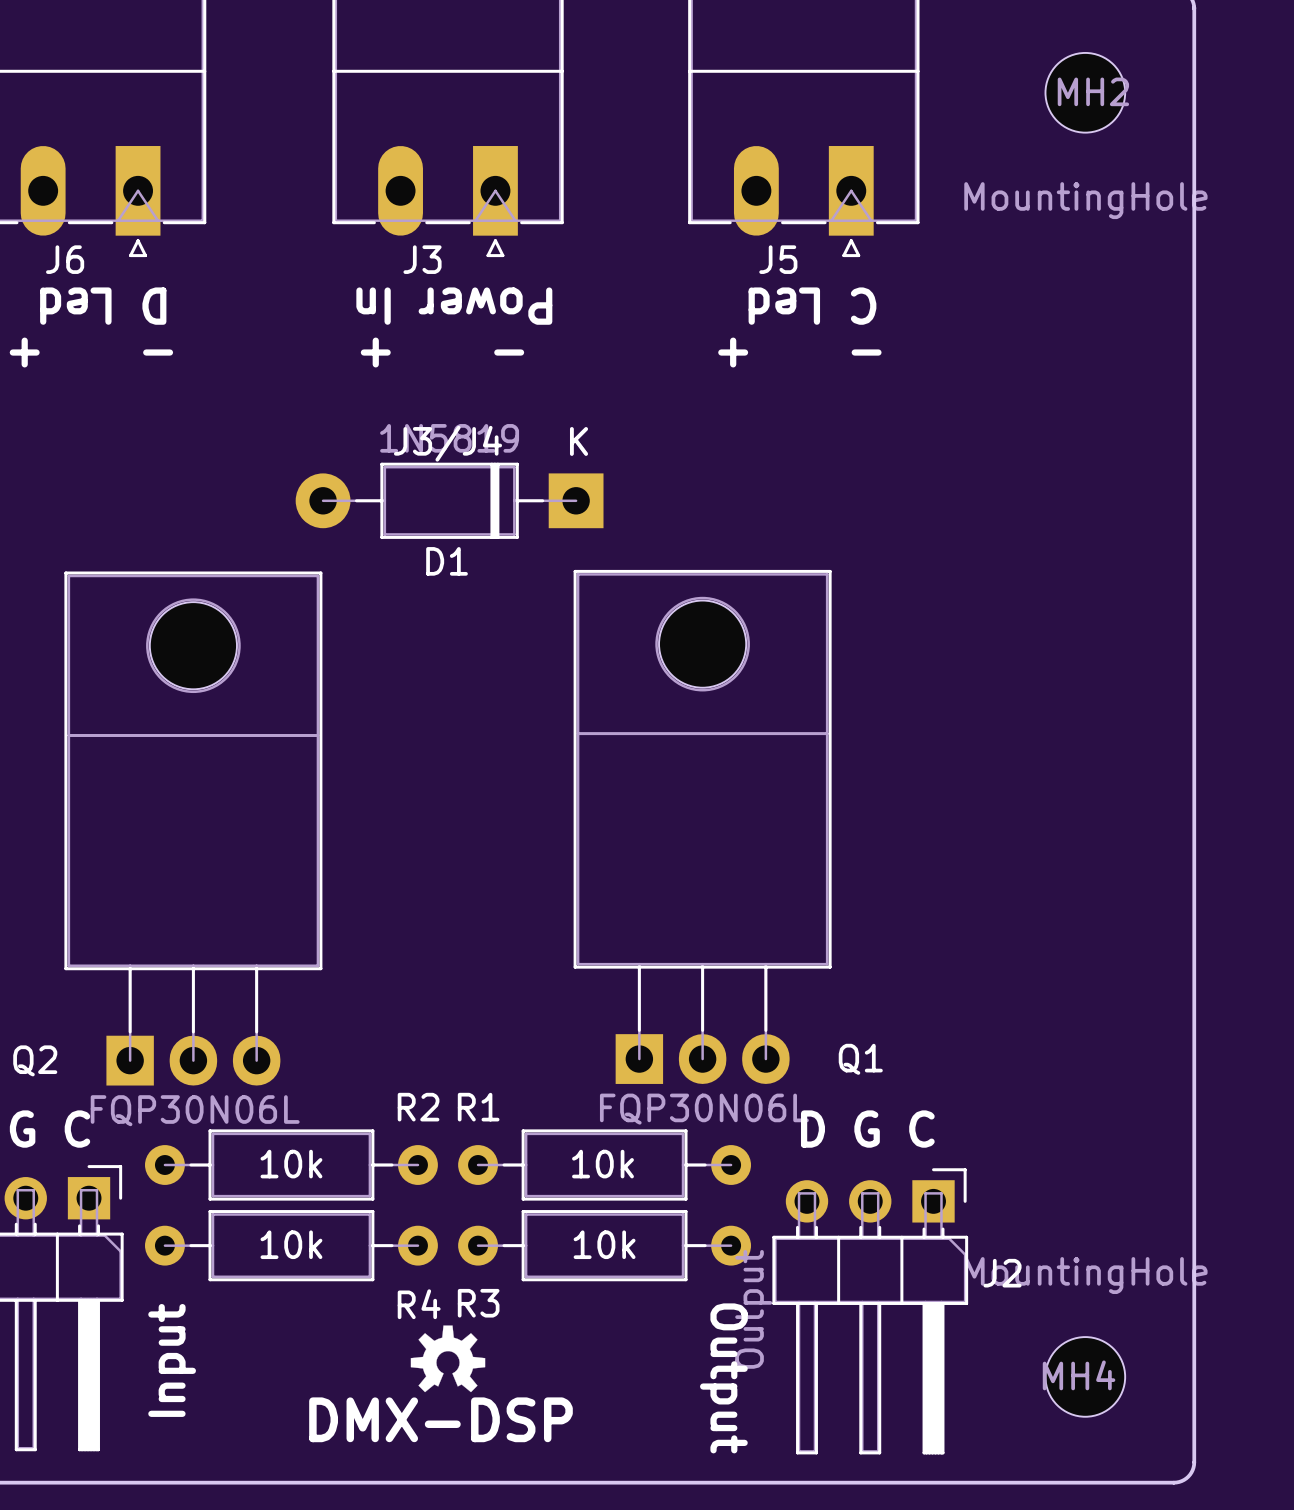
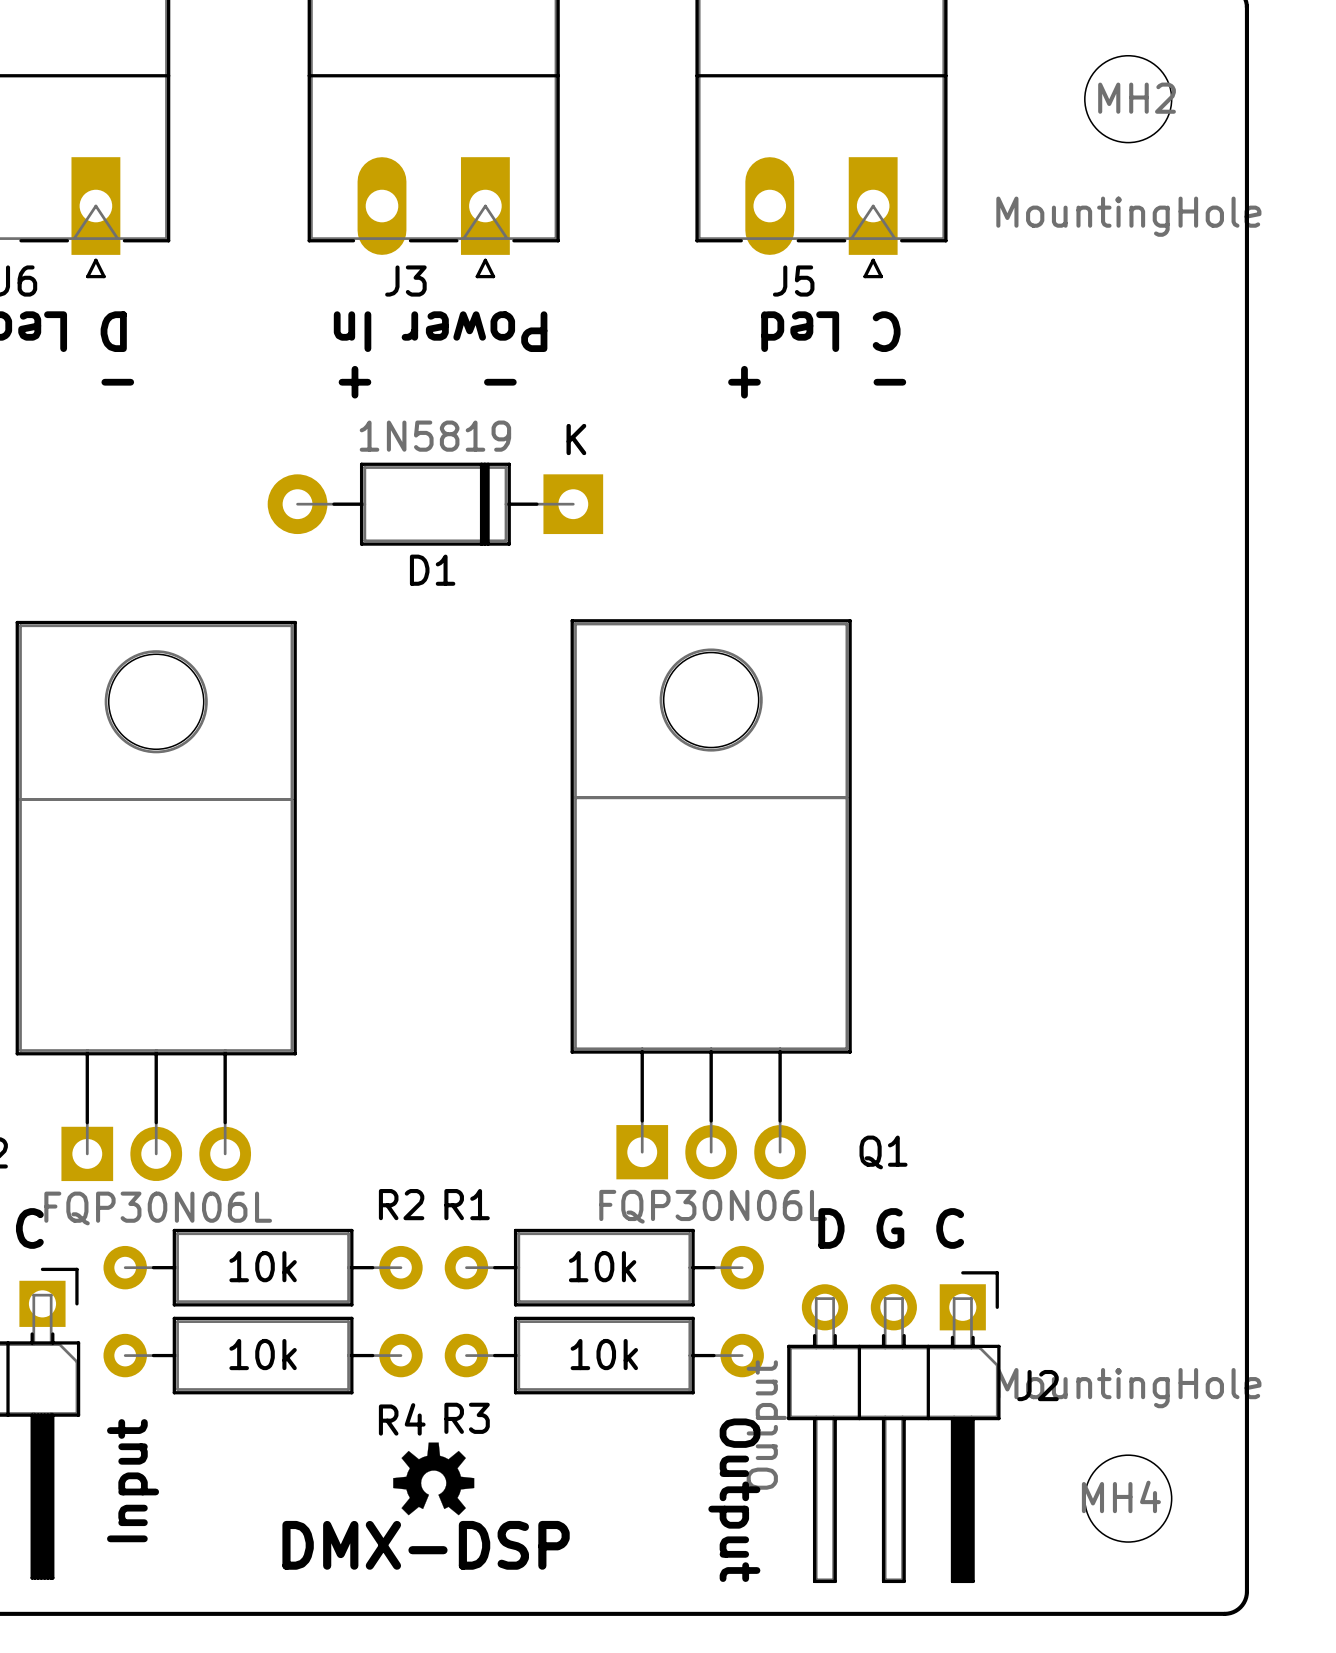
text: J3/J4 (448, 443) -> none
D1 position: (449, 500) -> (435, 504)

